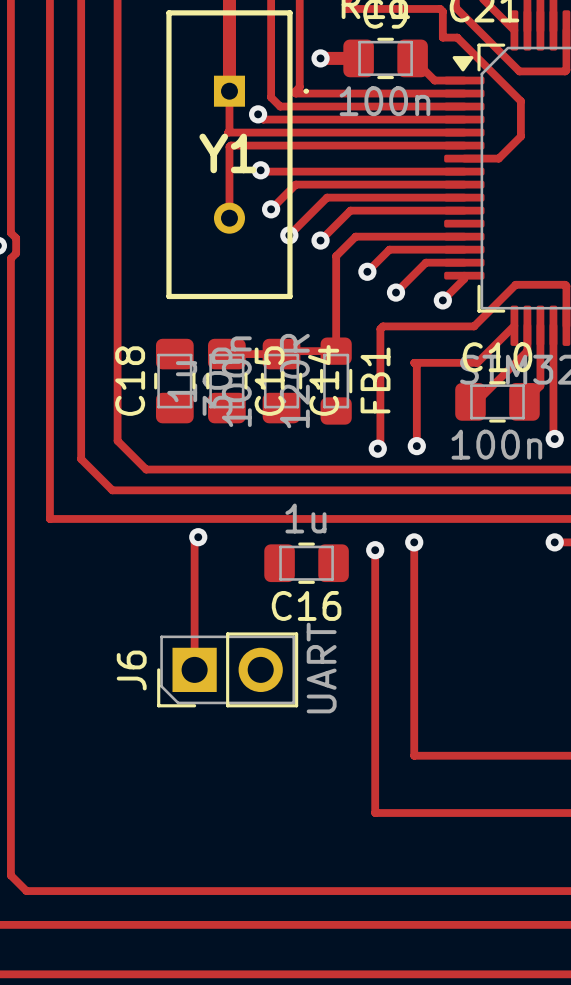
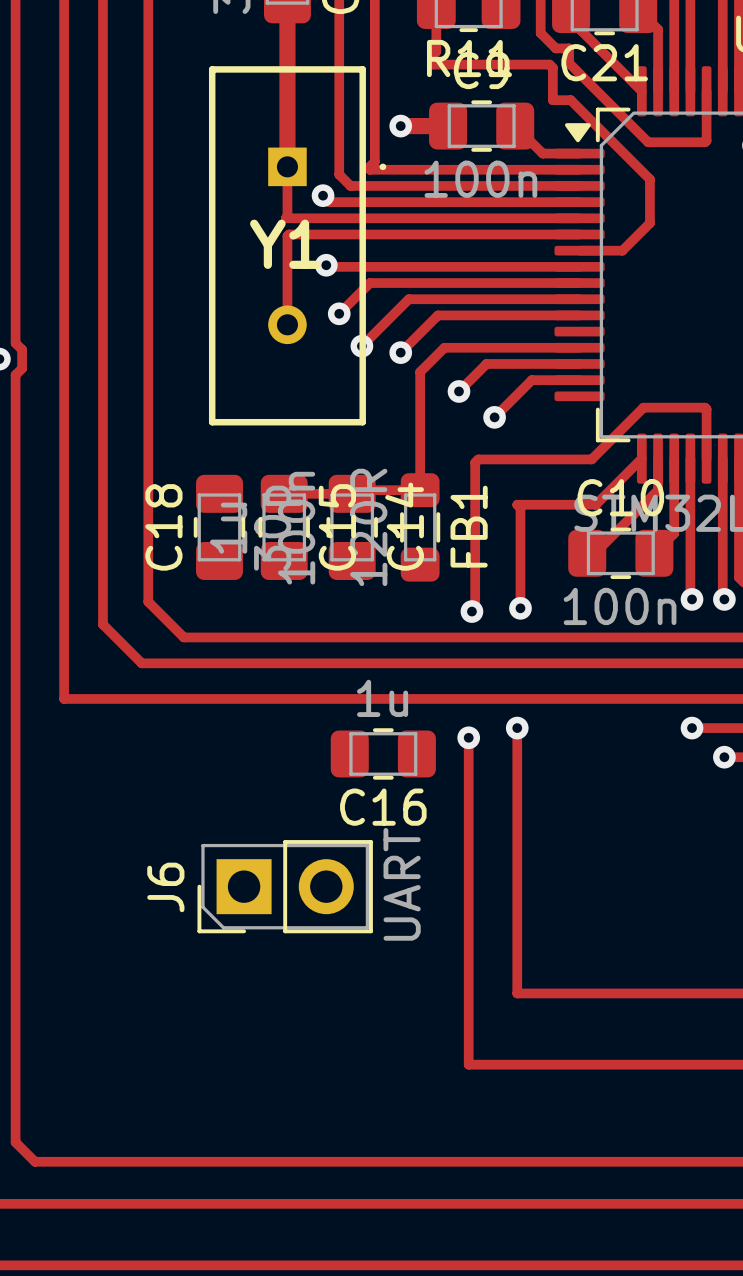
track: (464, 275) (464, 278) (442, 300) -> none
via: (442, 300) -> none
track: (198, 537) (194, 540) (194, 669) -> none
via: (198, 537) -> none

